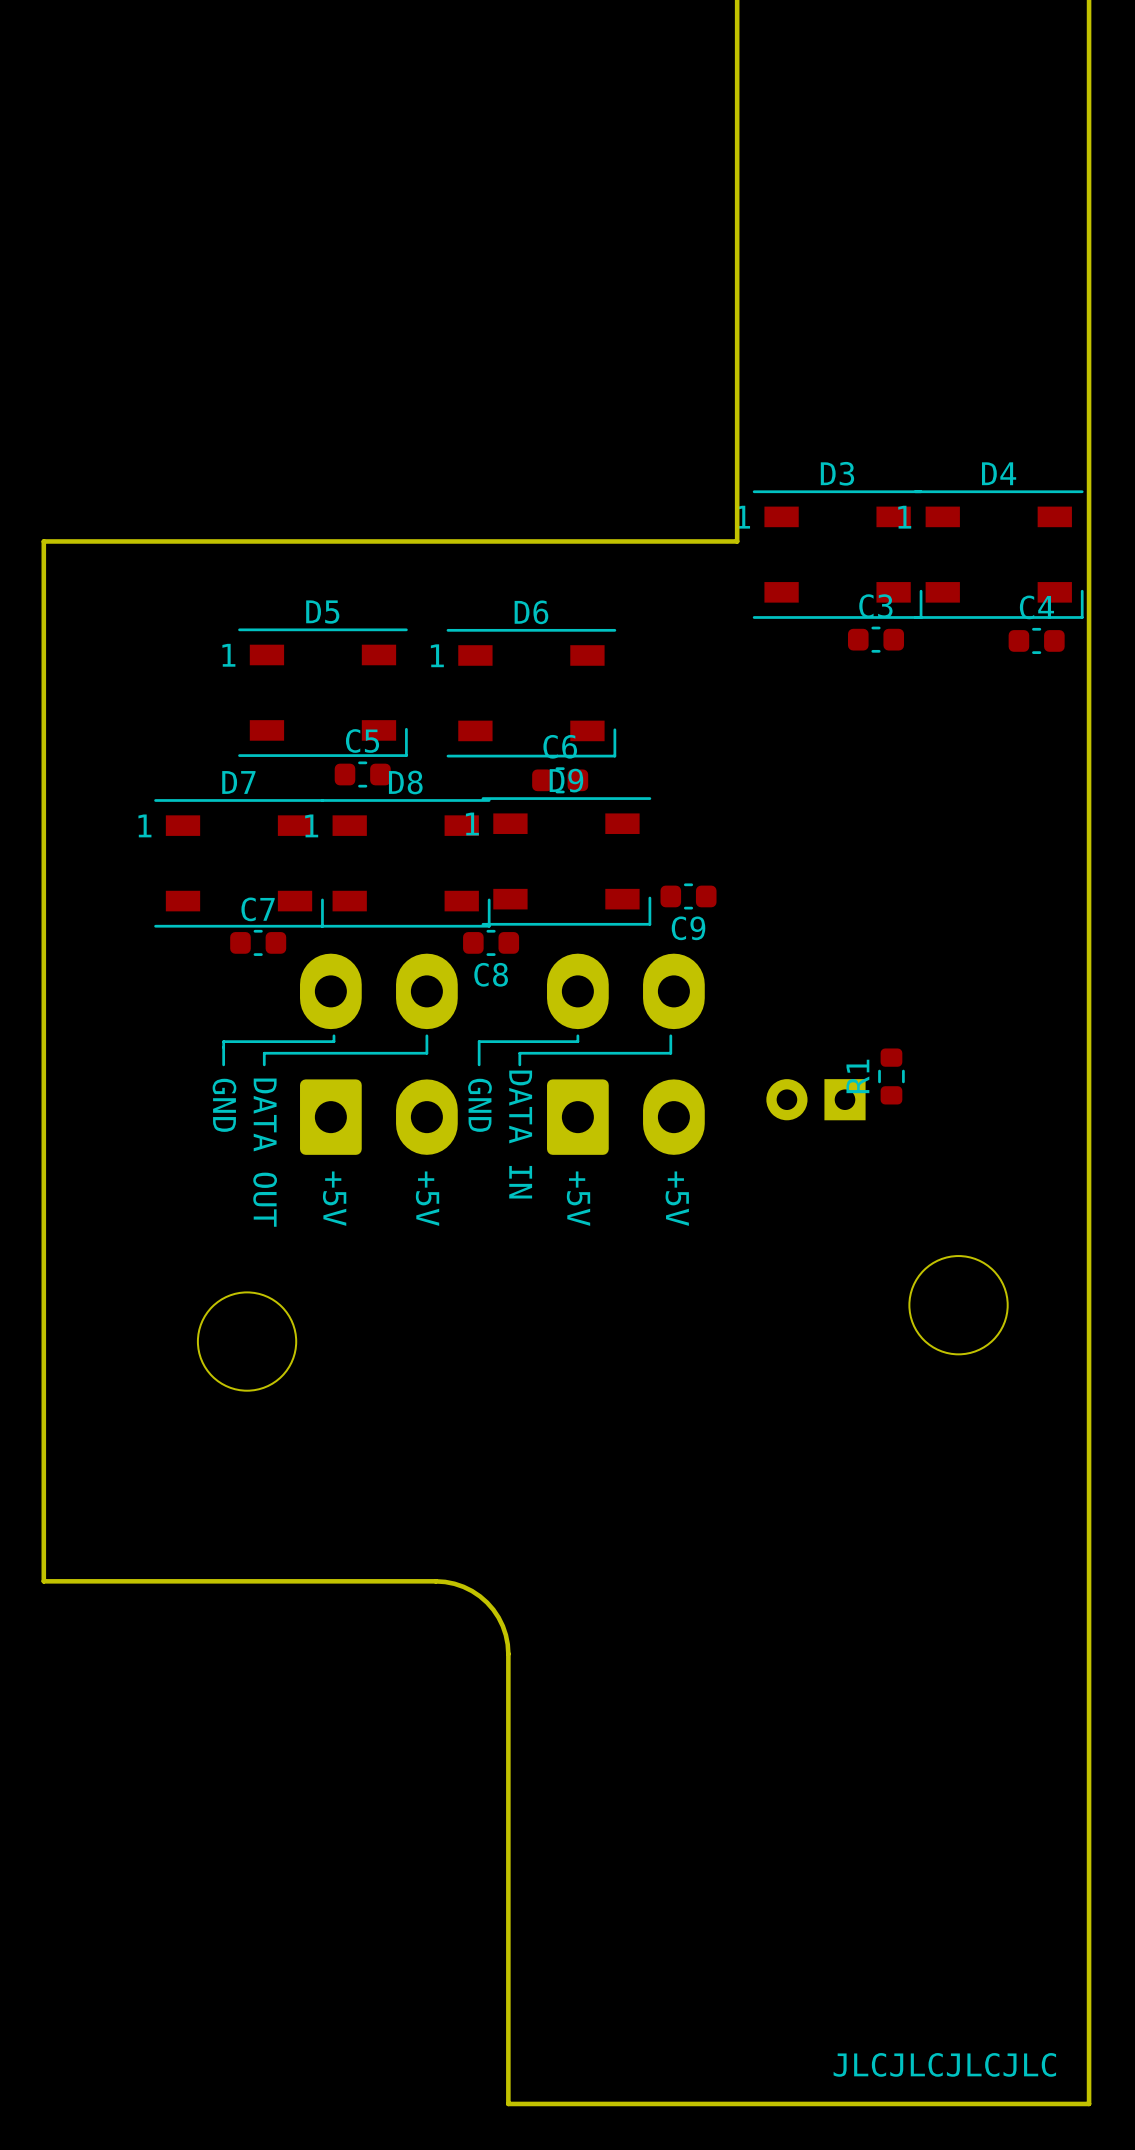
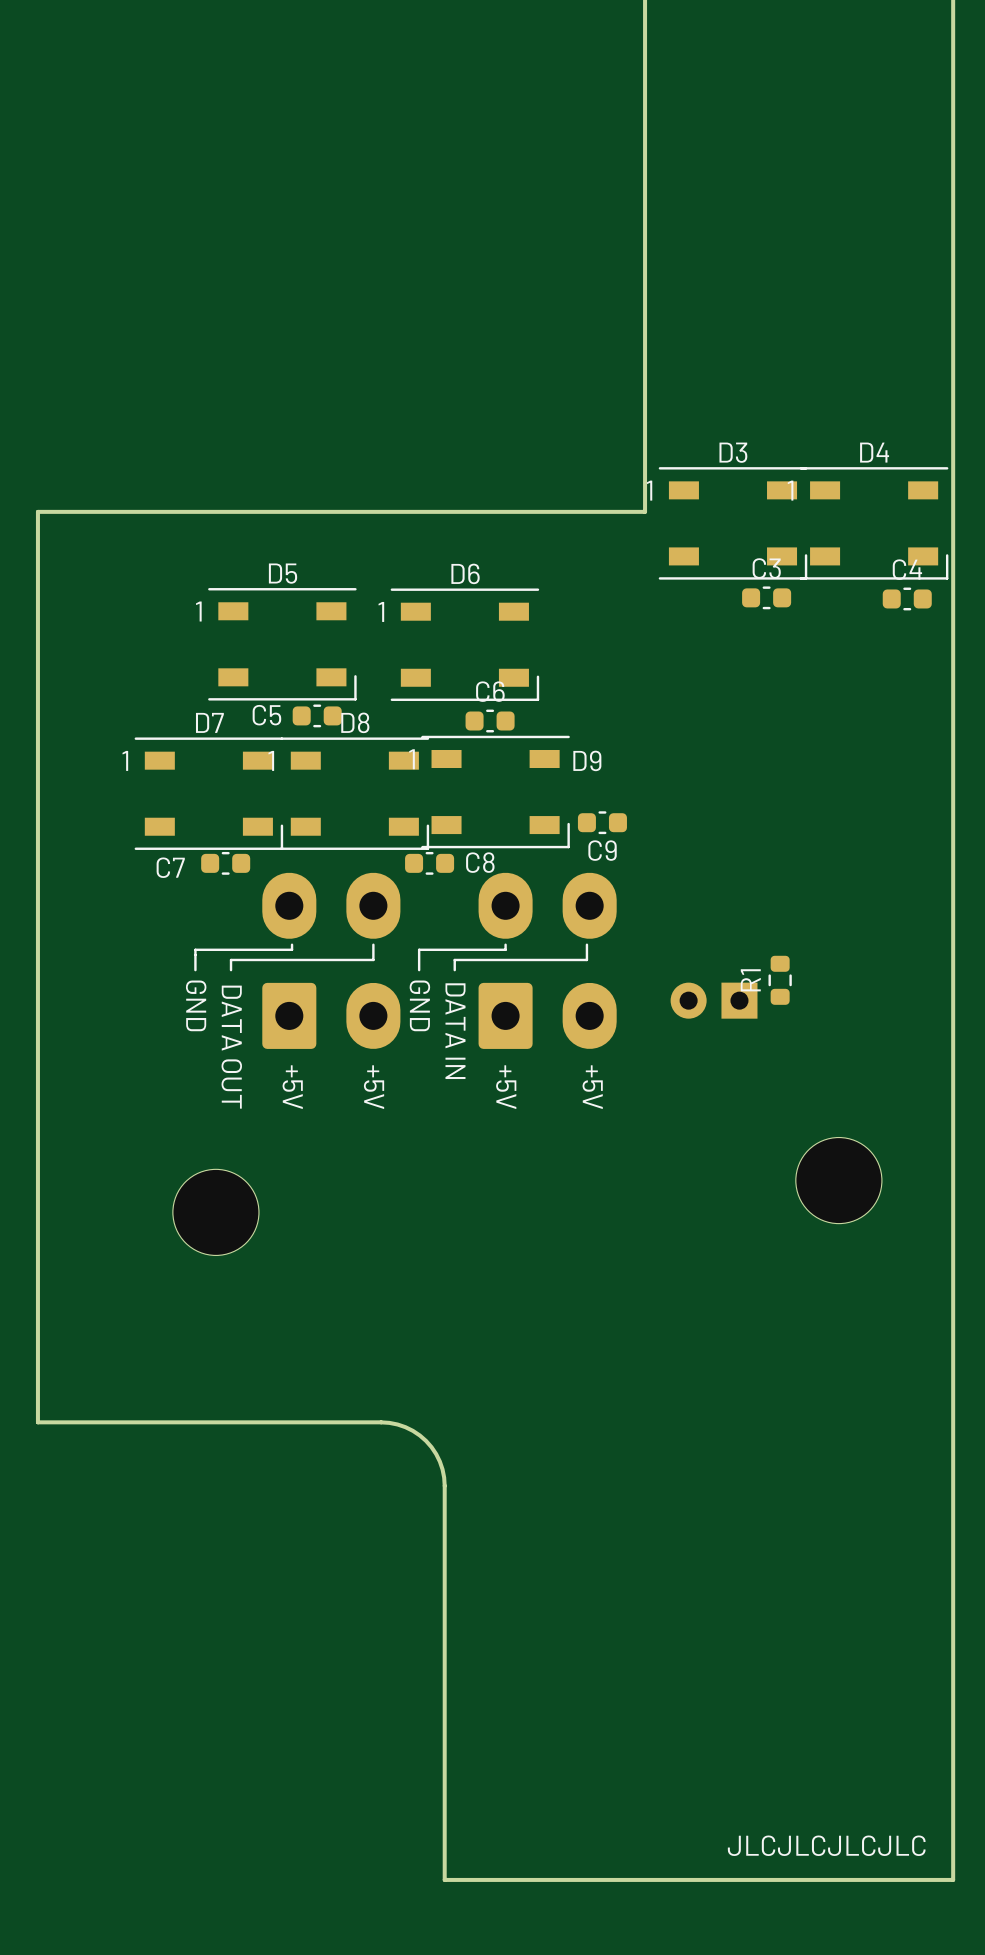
C5 name position: C5 (362, 740) -> C5 (266, 715)
D9 name position: D9 (566, 780) -> D9 (587, 760)
C7 name position: C7 (258, 909) -> C7 (170, 867)
C8 name position: C8 (491, 974) -> C8 (480, 862)

